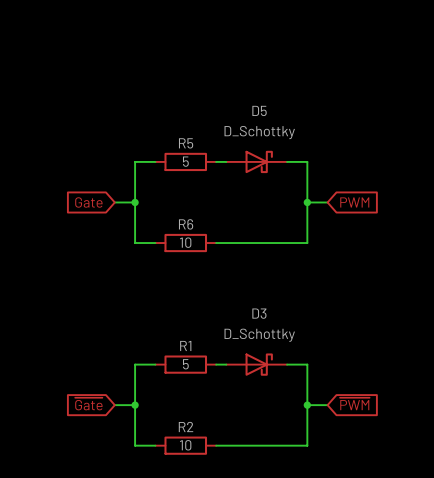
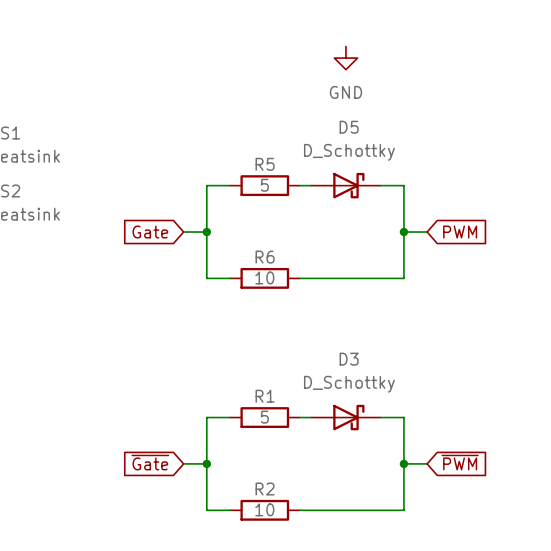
power symbol: none -> GND (345, 58)

